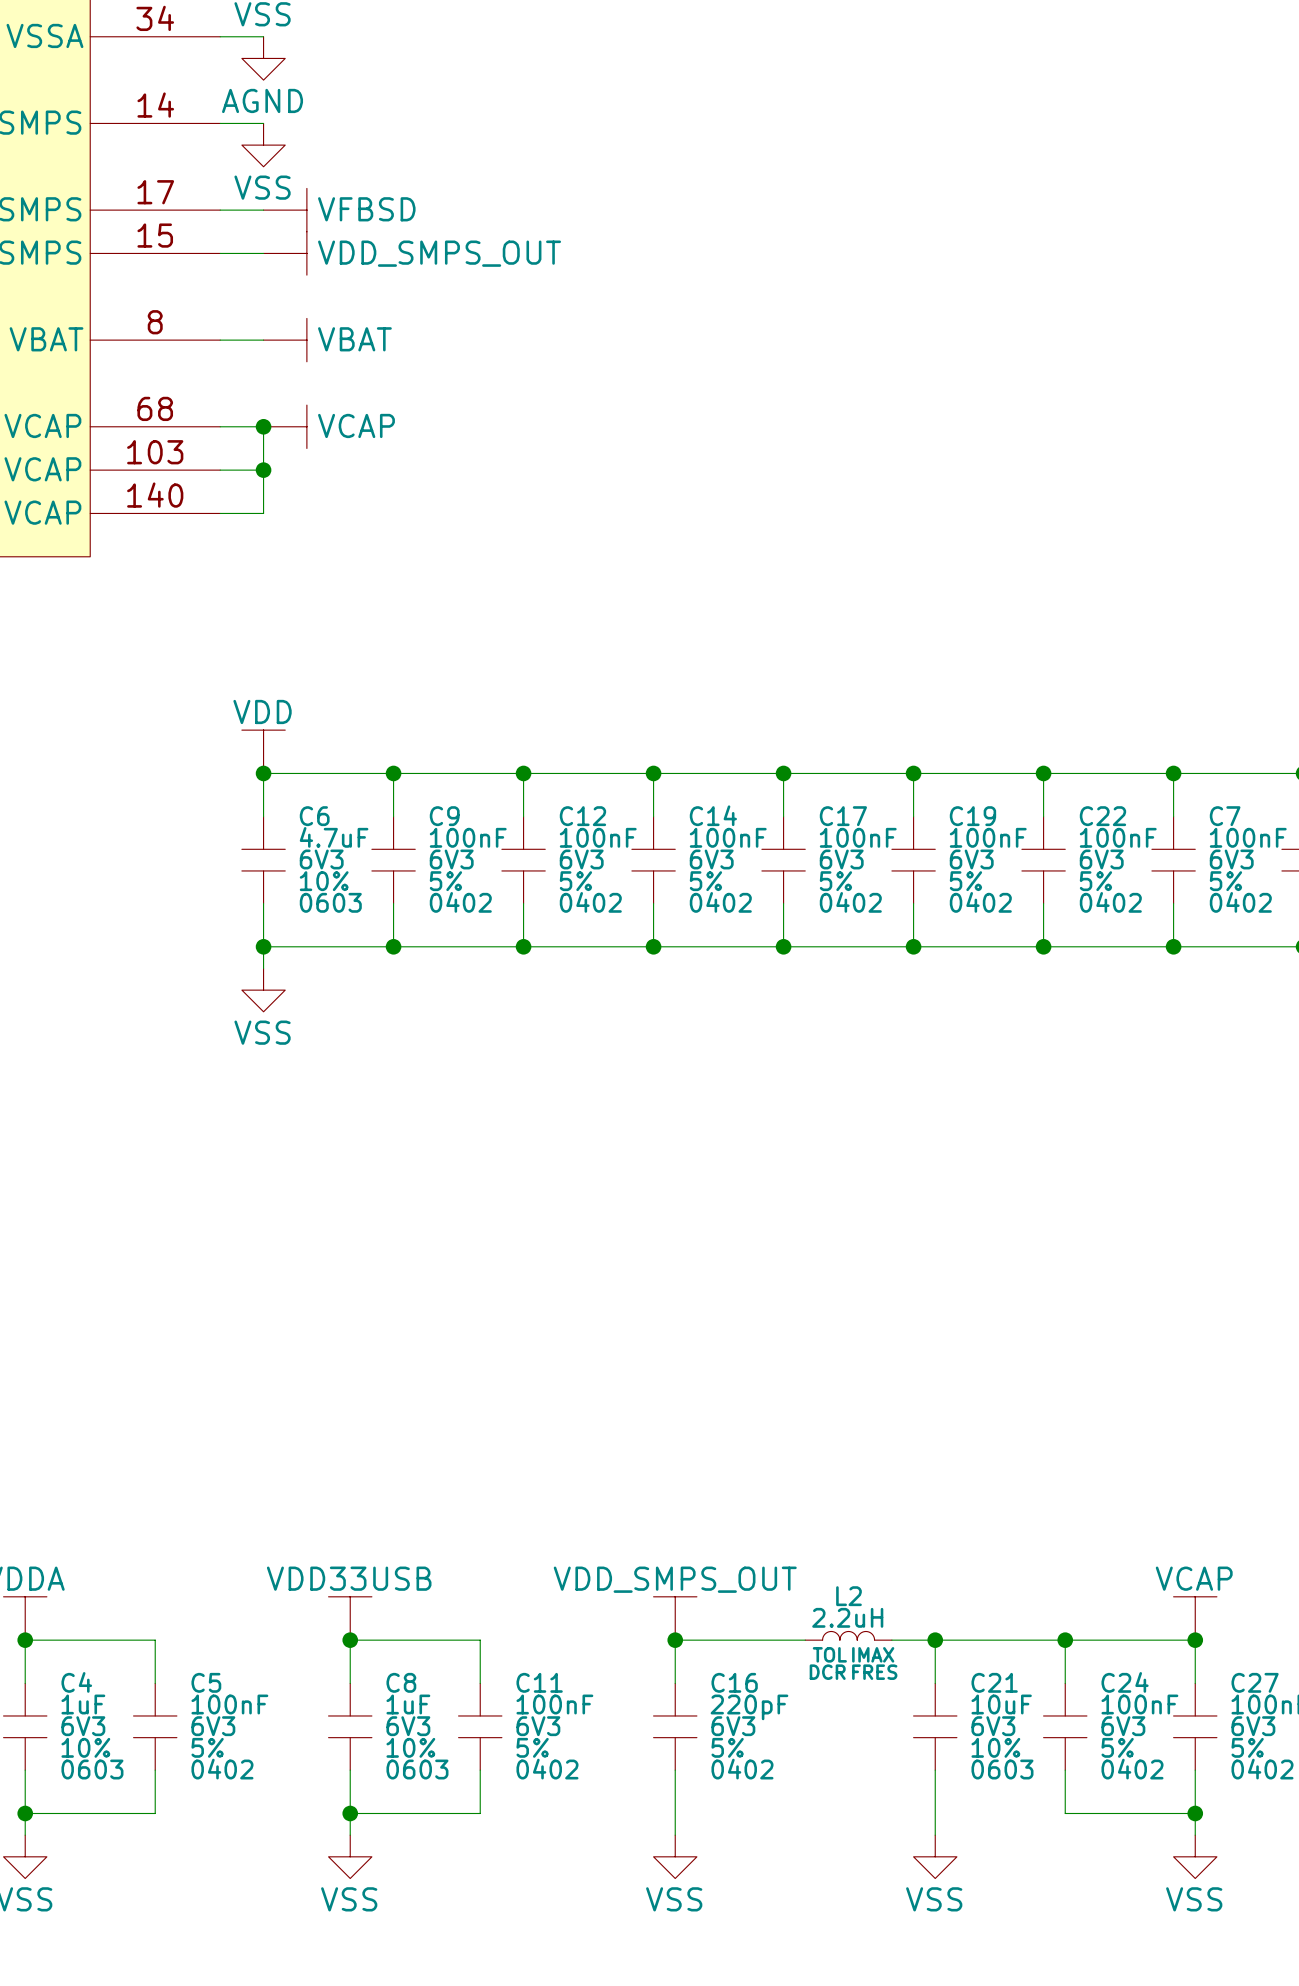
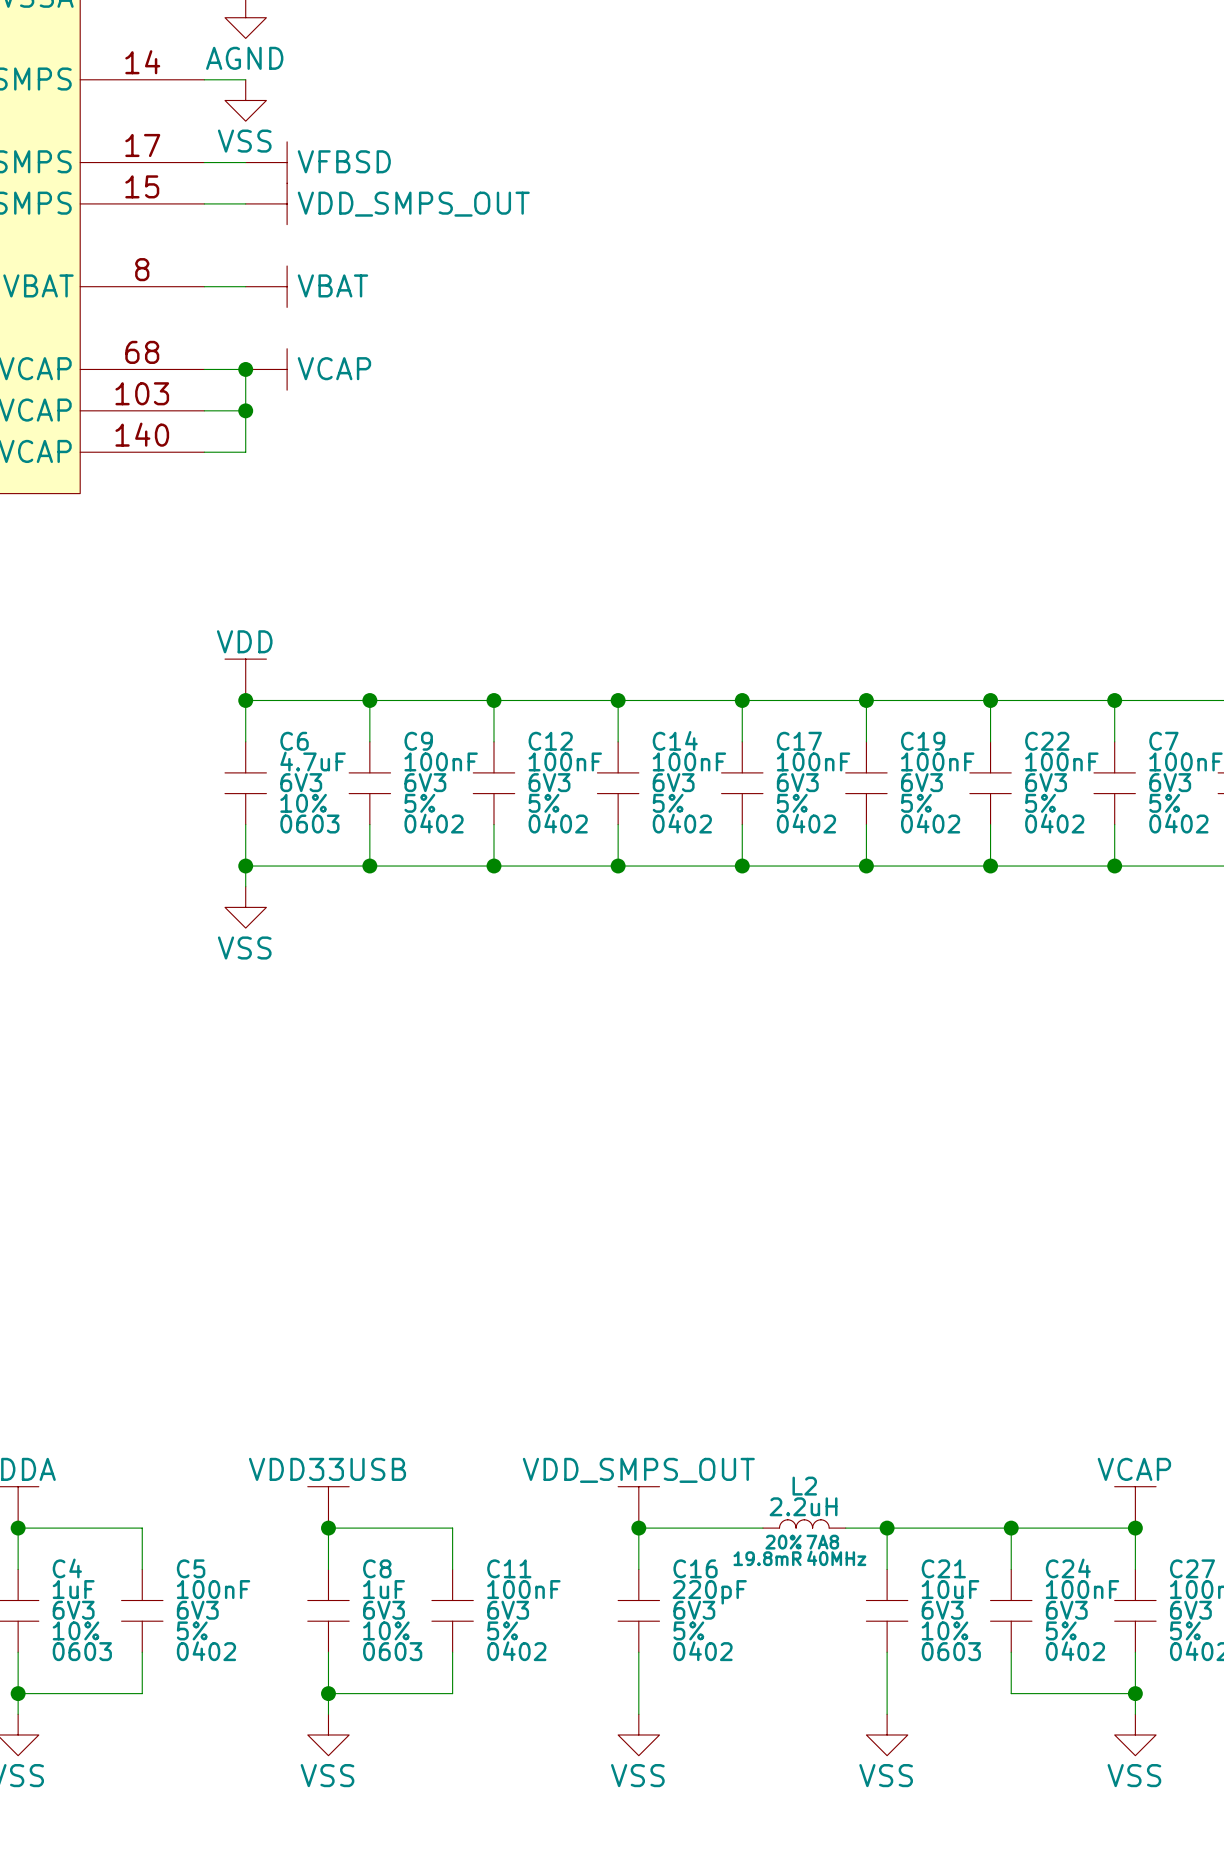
L2 text: TOL (829, 1654) -> 20% (783, 1542)
L2 text: IMAX (873, 1654) -> 7A8 (822, 1542)
L2 text: DCR (827, 1672) -> 19.8mR (767, 1558)
L2 text: FRES (874, 1672) -> 40MHz (836, 1558)

